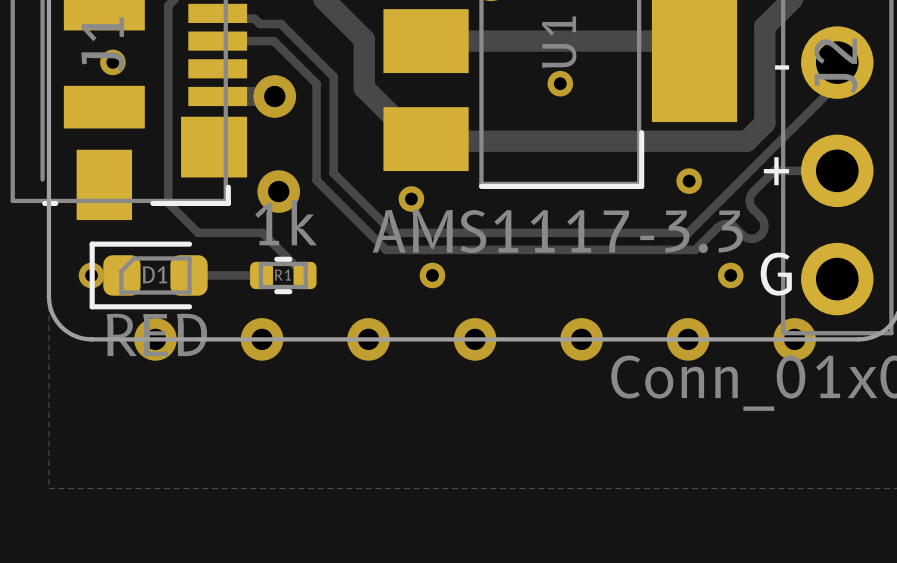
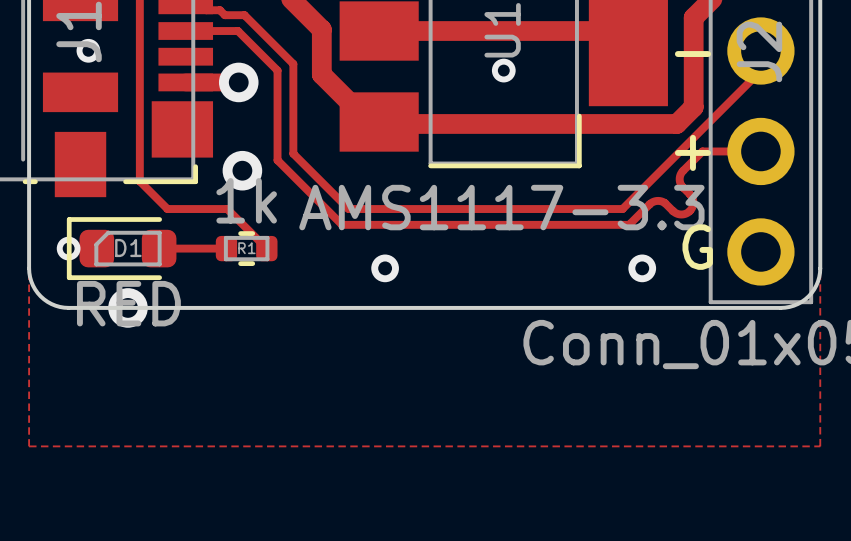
via: (689, 181) -> none
via: (411, 199) -> none
via position: (432, 275) -> (385, 268)
via position: (730, 275) -> (642, 268)
via: (262, 339) -> none
via: (368, 339) -> none
via: (475, 339) -> none
via: (581, 339) -> none
via: (688, 339) -> none
via: (794, 339) -> none

